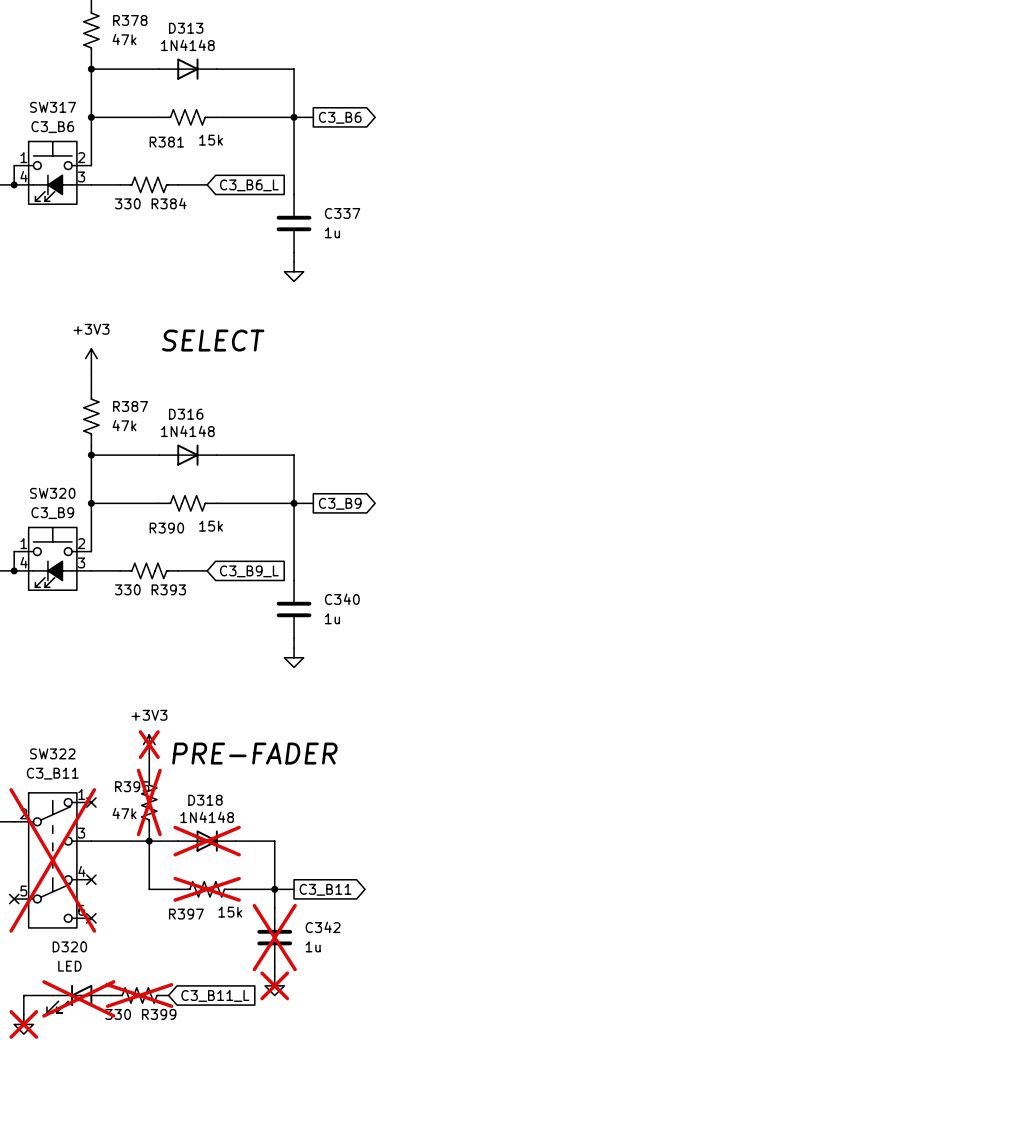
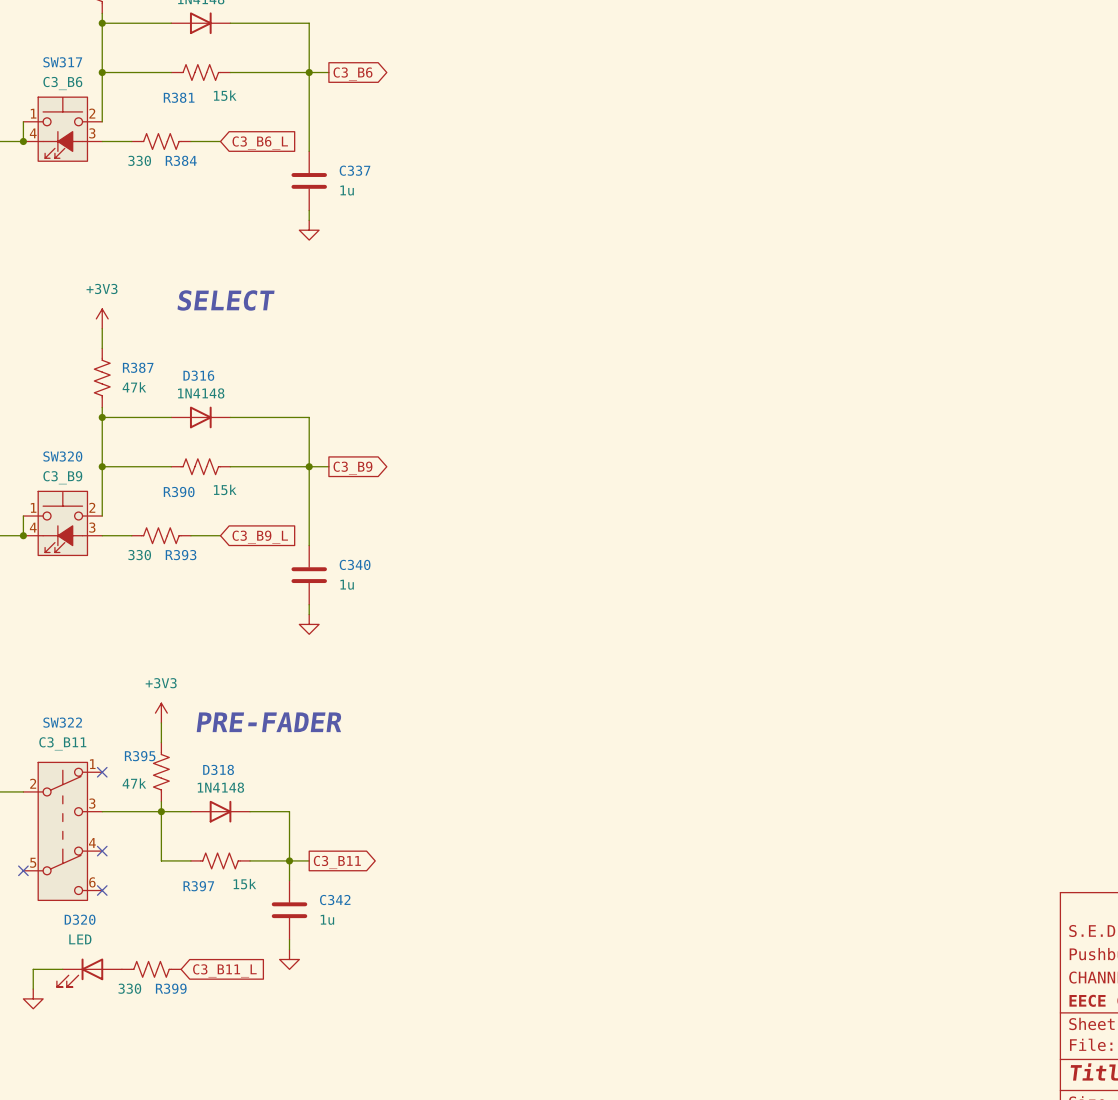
power symbol do-not-place cross: (149, 744) -> none
R395 do-not-place cross: (149, 802) -> none
D318 do-not-place cross: (207, 841) -> none
SW322 do-not-place cross: (52, 860) -> none
R397 do-not-place cross: (207, 889) -> none
C342 do-not-place cross: (274, 937) -> none
power symbol do-not-place cross: (274, 985) -> none
R399 do-not-place cross: (139, 995) -> none
D320 do-not-place cross: (78, 998) -> none
power symbol do-not-place cross: (23, 1024) -> none

